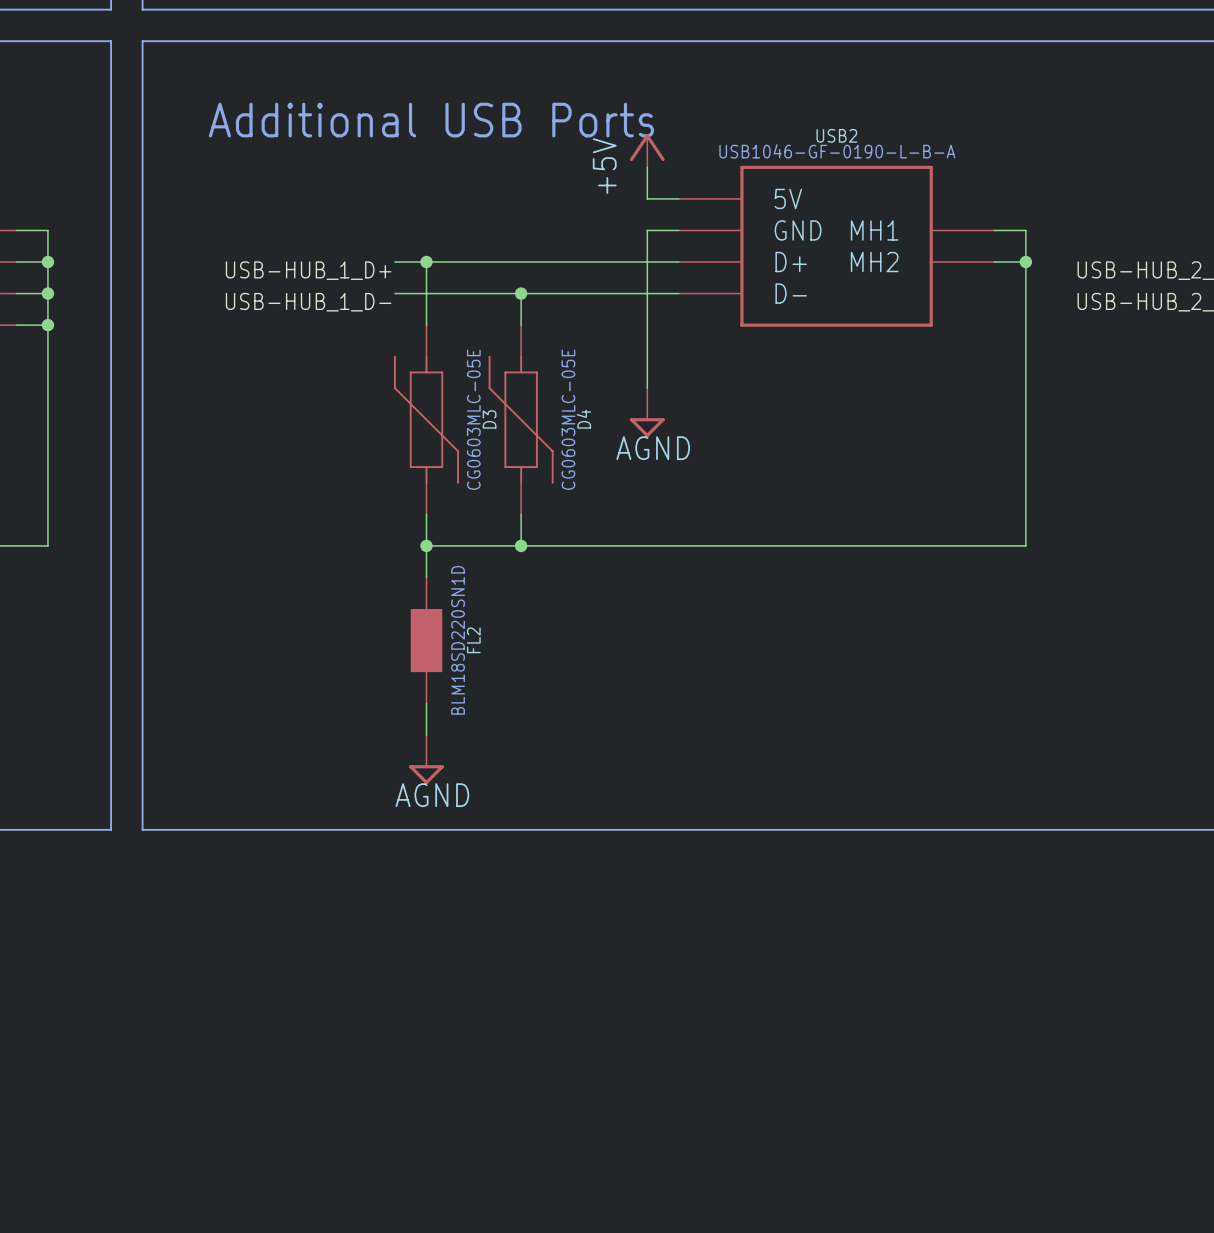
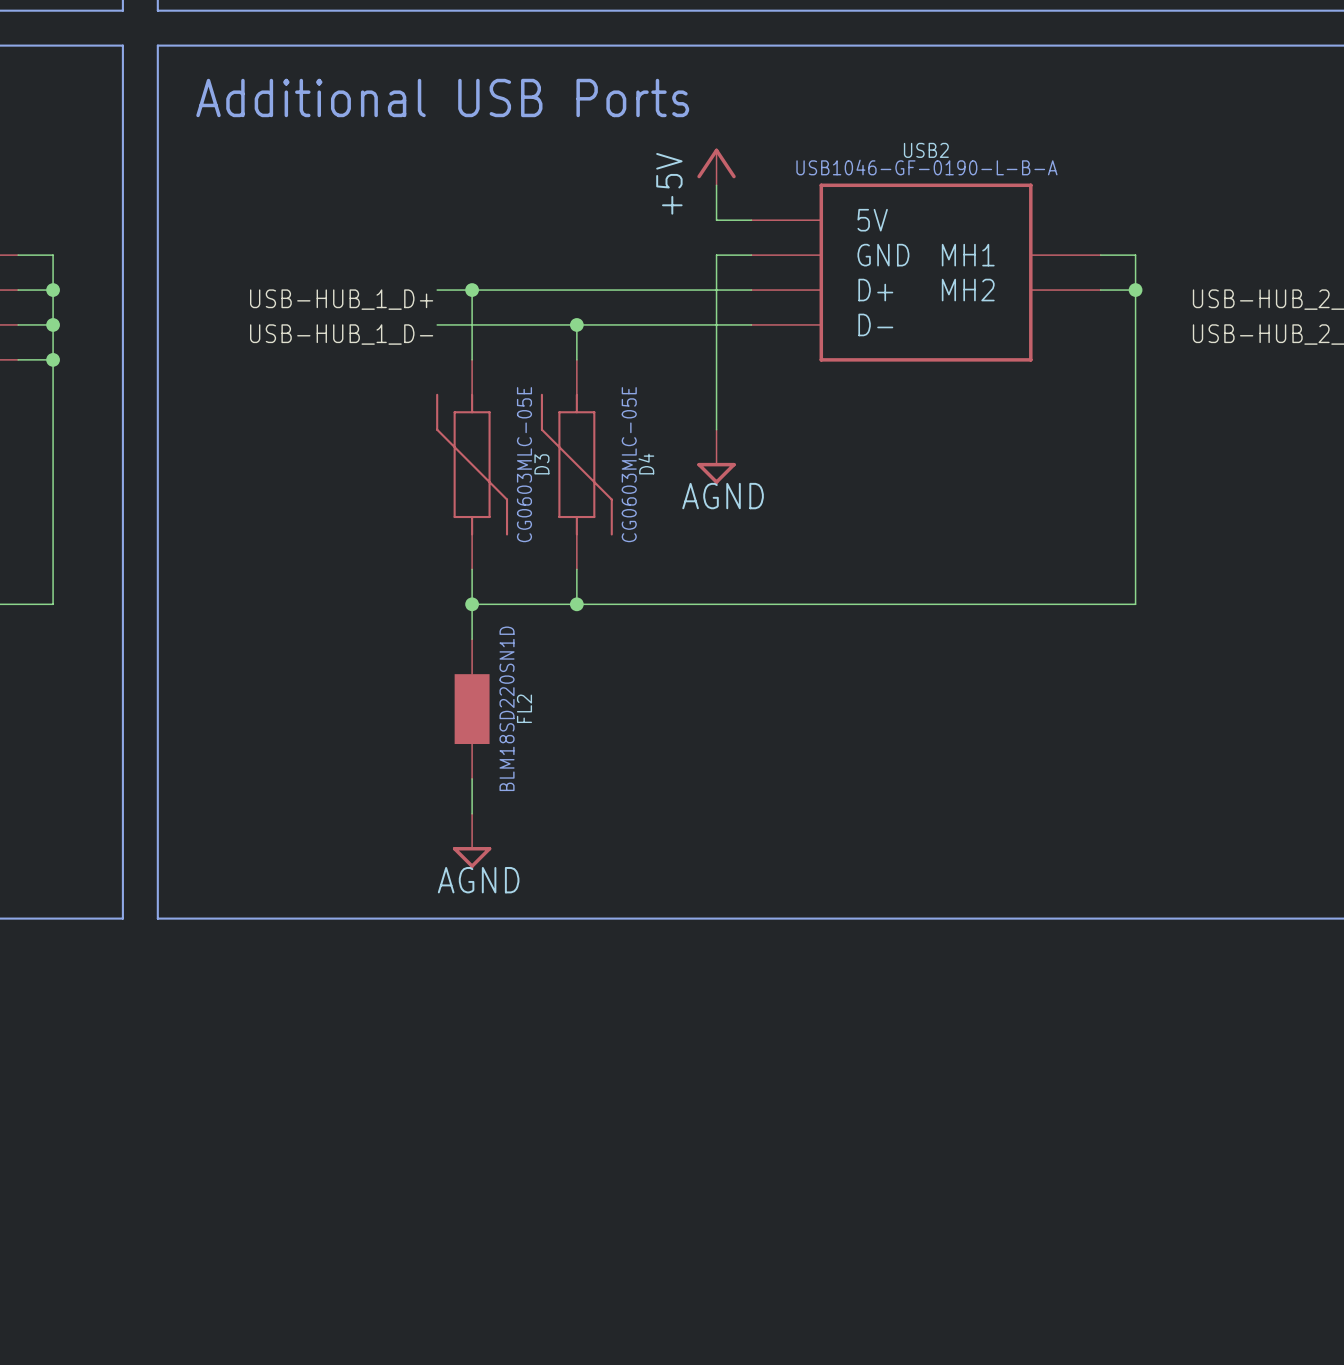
text position: Additional USB Ports (431, 120) -> Additional USB Ports (442, 97)

